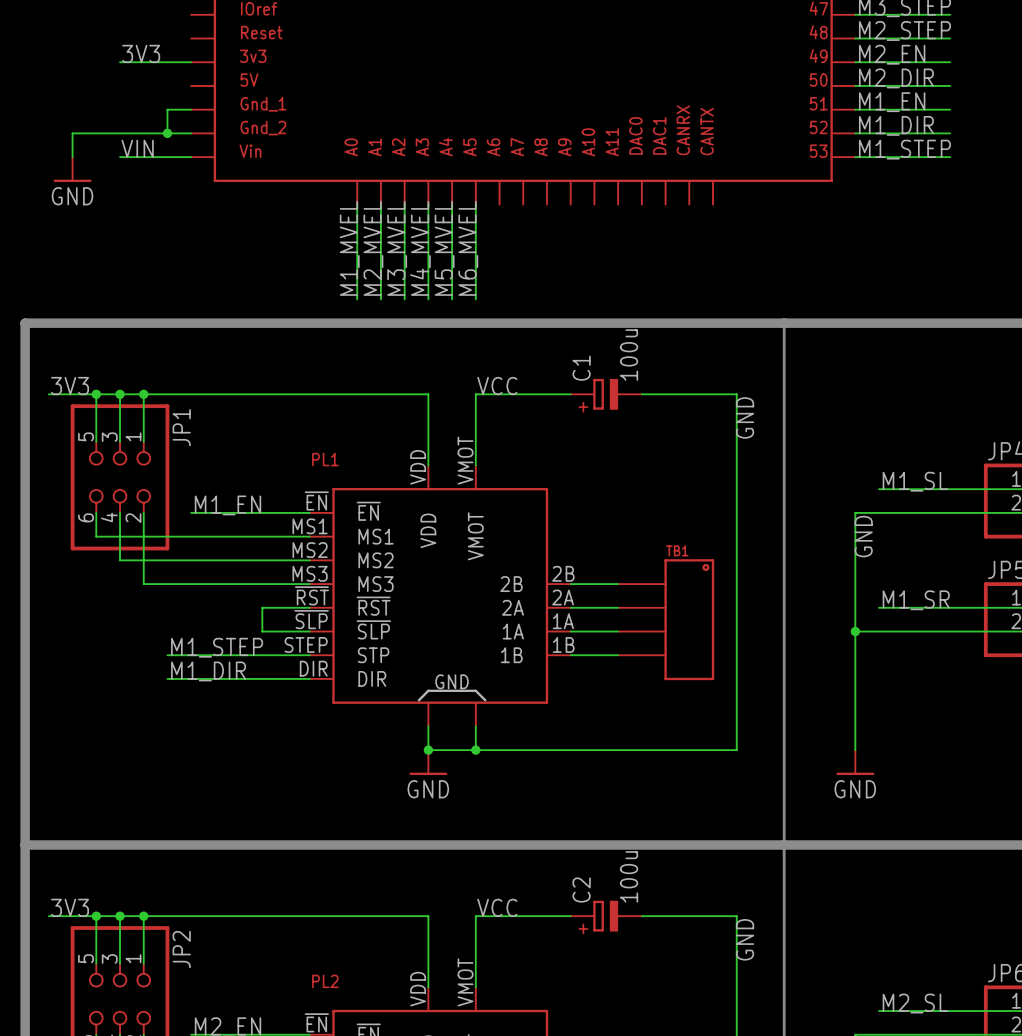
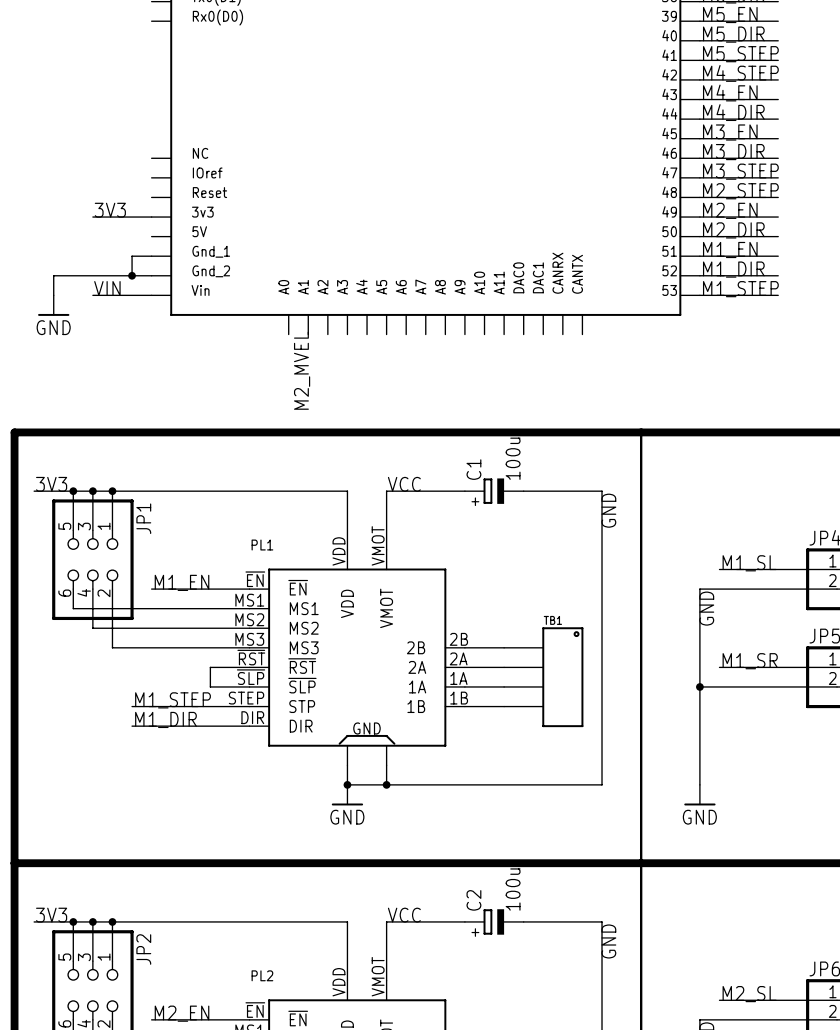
wire: (357, 204) (357, 299) -> none
wire: (380, 204) (380, 299) -> none
wire: (404, 204) (404, 299) -> none
wire: (428, 204) (428, 299) -> none
wire: (452, 204) (452, 299) -> none
wire: (475, 204) (475, 299) -> none
label: M1_MVEL (349, 248) -> none
label: M3_MVEL (397, 248) -> none
label: M4_MVEL (420, 248) -> none
label: M5_MVEL (444, 248) -> none
label: M6_MVEL (468, 248) -> none

